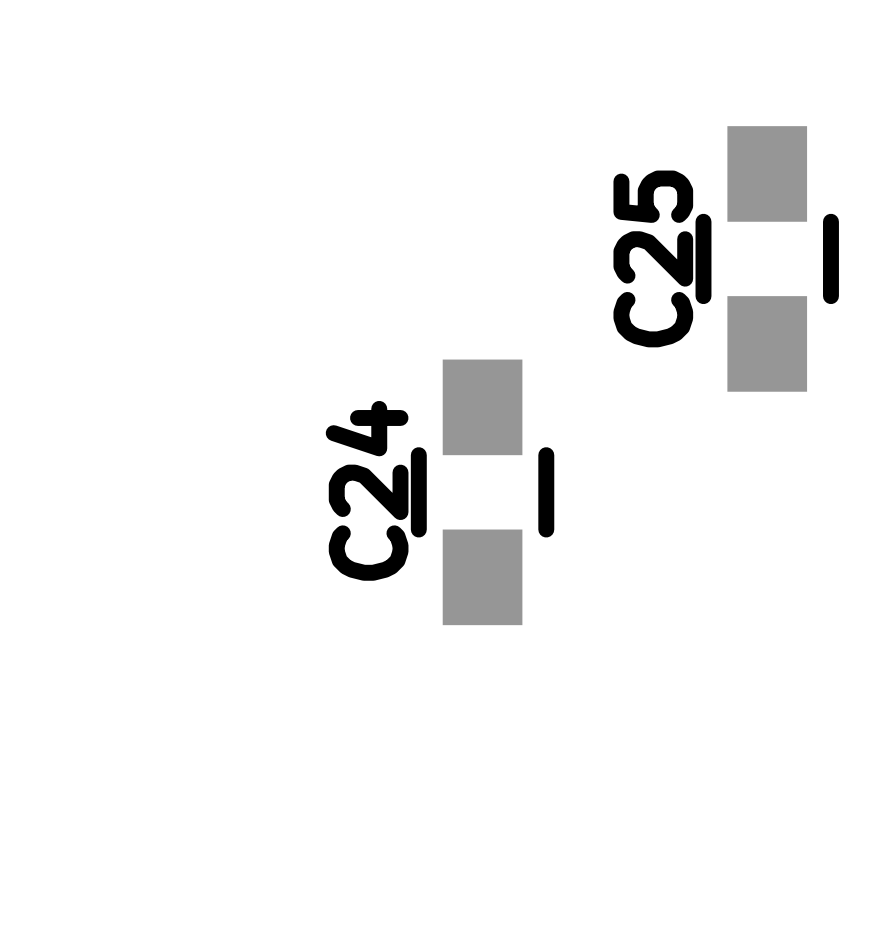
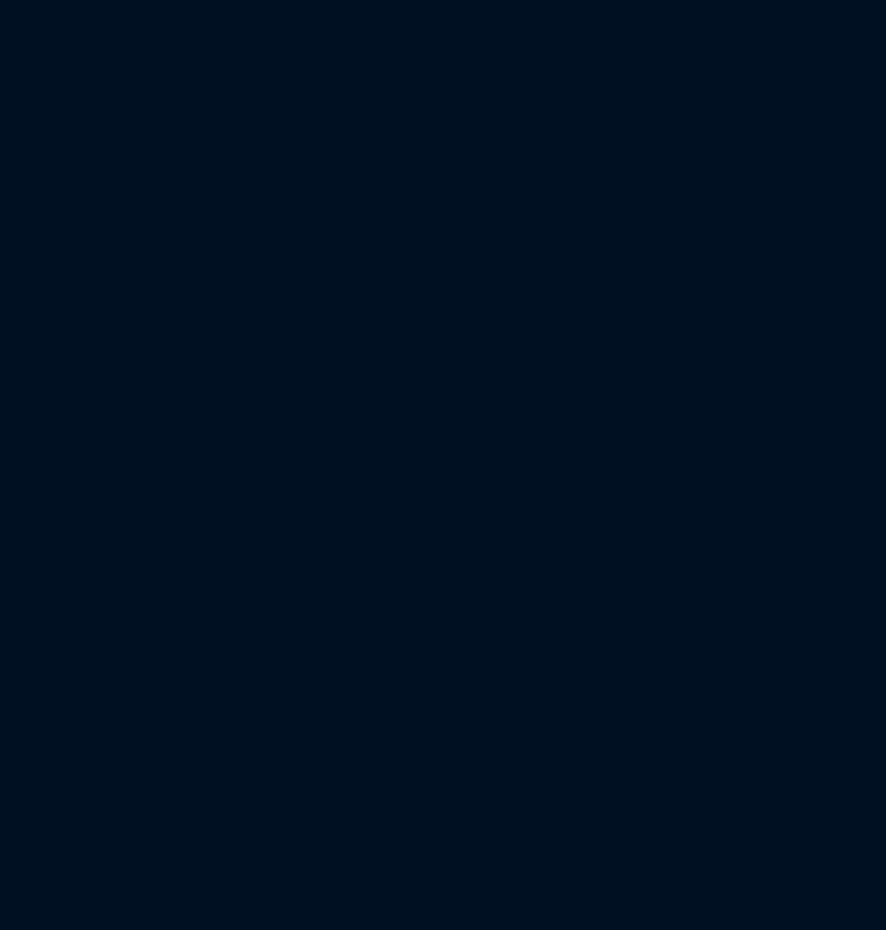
C25: (767, 258) -> none
C24: (482, 492) -> none

